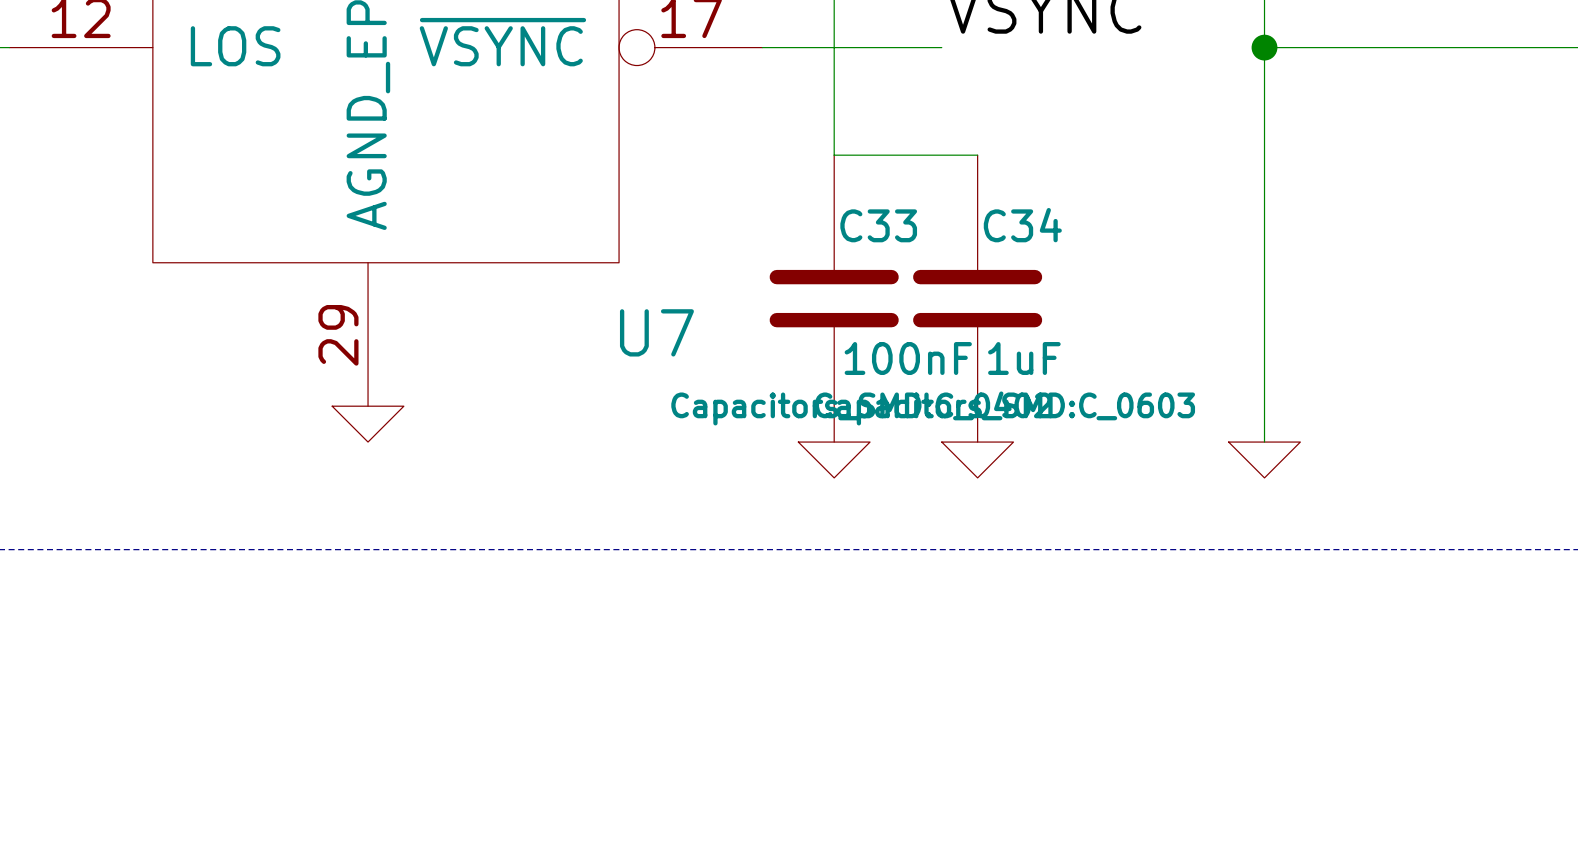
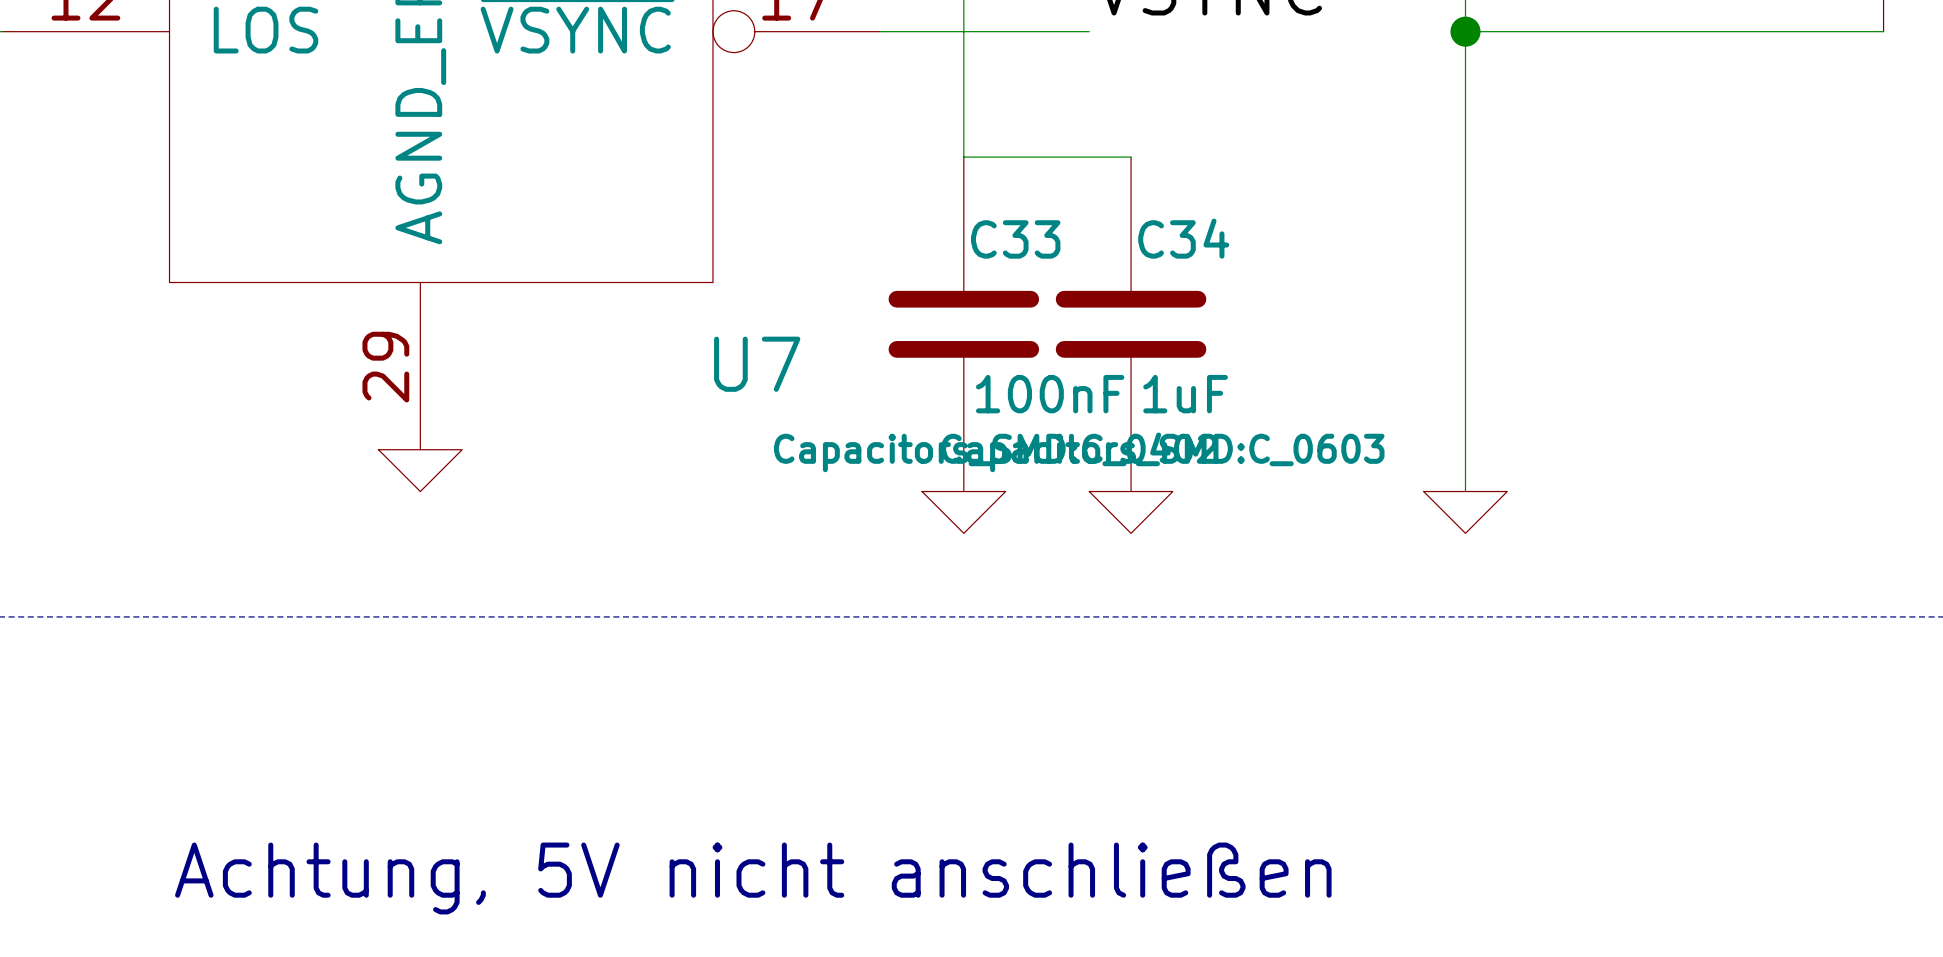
text: none -> Achtung, 5V nicht anschließen (753, 878)

